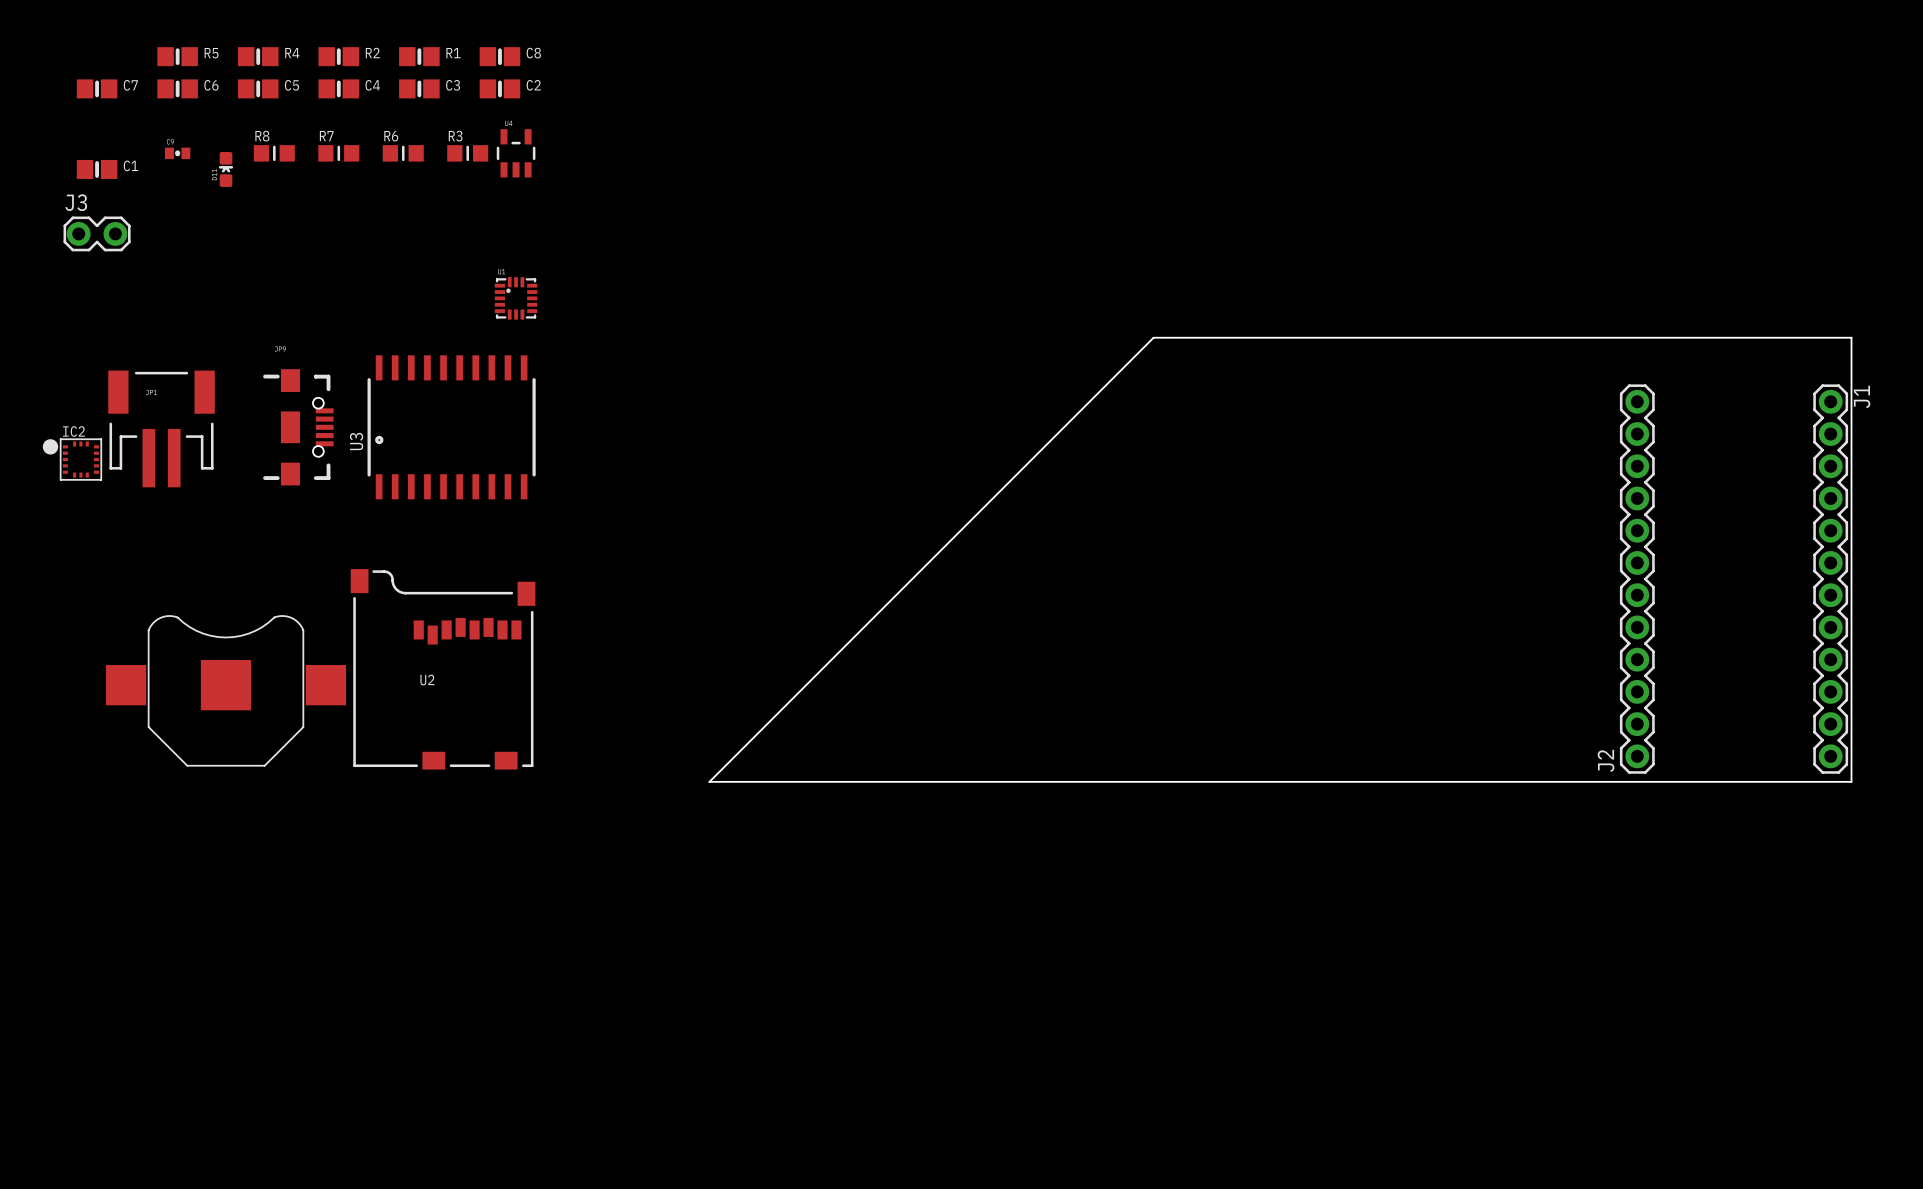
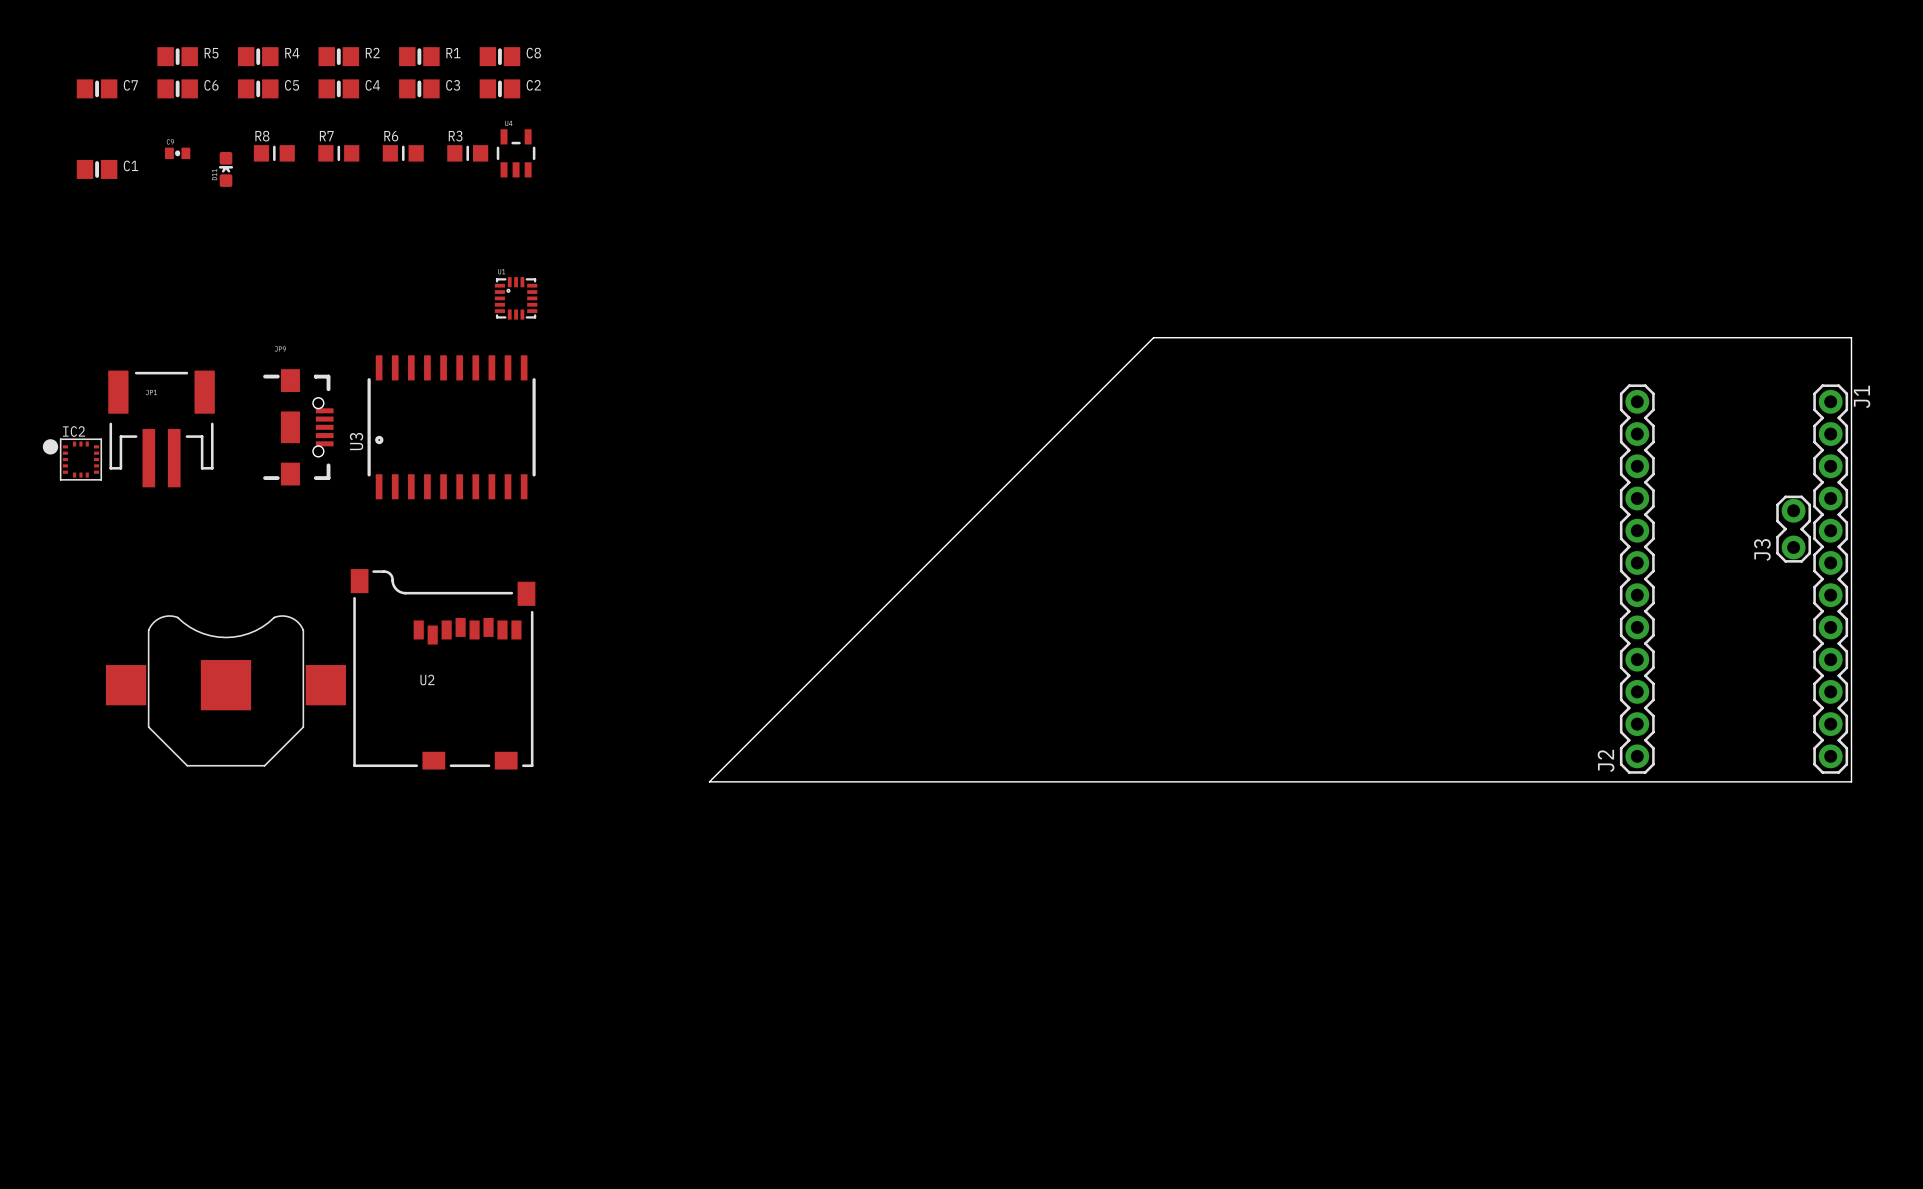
J3 name position: J3 (76, 202) -> J3 (1762, 549)
J3 rotation: 0° (97, 233) -> 90° clockwise (1793, 529)
J3 position: (97, 233) -> (1793, 529)

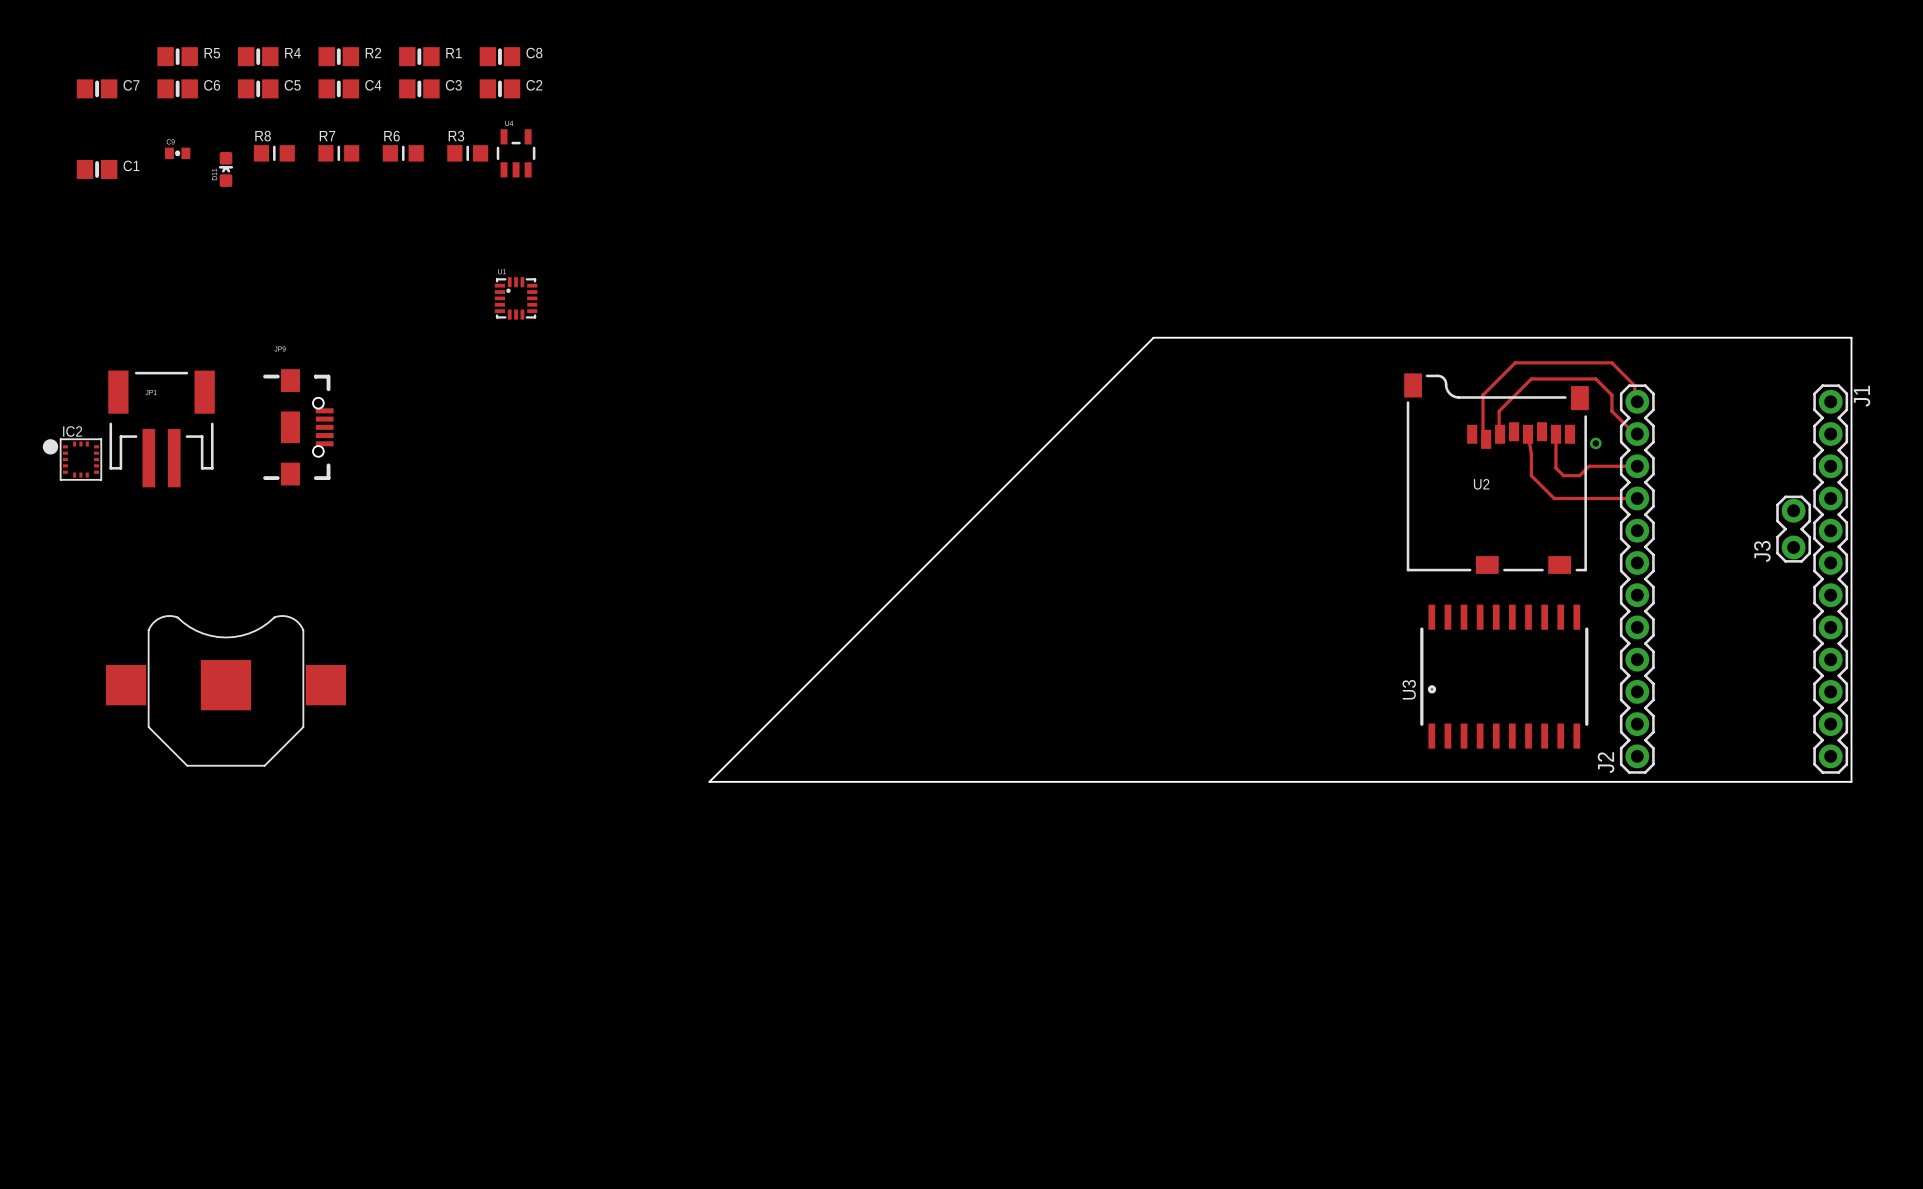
track: none -> (1637, 401) (1634, 401) (1634, 385) (1611, 362) (1515, 362) (1483, 395) (1483, 443)
U3 position: (451, 427) -> (1504, 676)
track: none -> (1528, 434) (1531, 453) (1531, 475) (1554, 498) (1637, 498)
track: none -> (1555, 434) (1555, 468) (1563, 475) (1579, 475) (1589, 466) (1637, 466)
track: none -> (1637, 434) (1634, 434) (1611, 411) (1611, 395) (1595, 378) (1531, 378) (1499, 411) (1500, 434)
via: none -> (1595, 443)
U2 position: (443, 669) -> (1496, 473)

